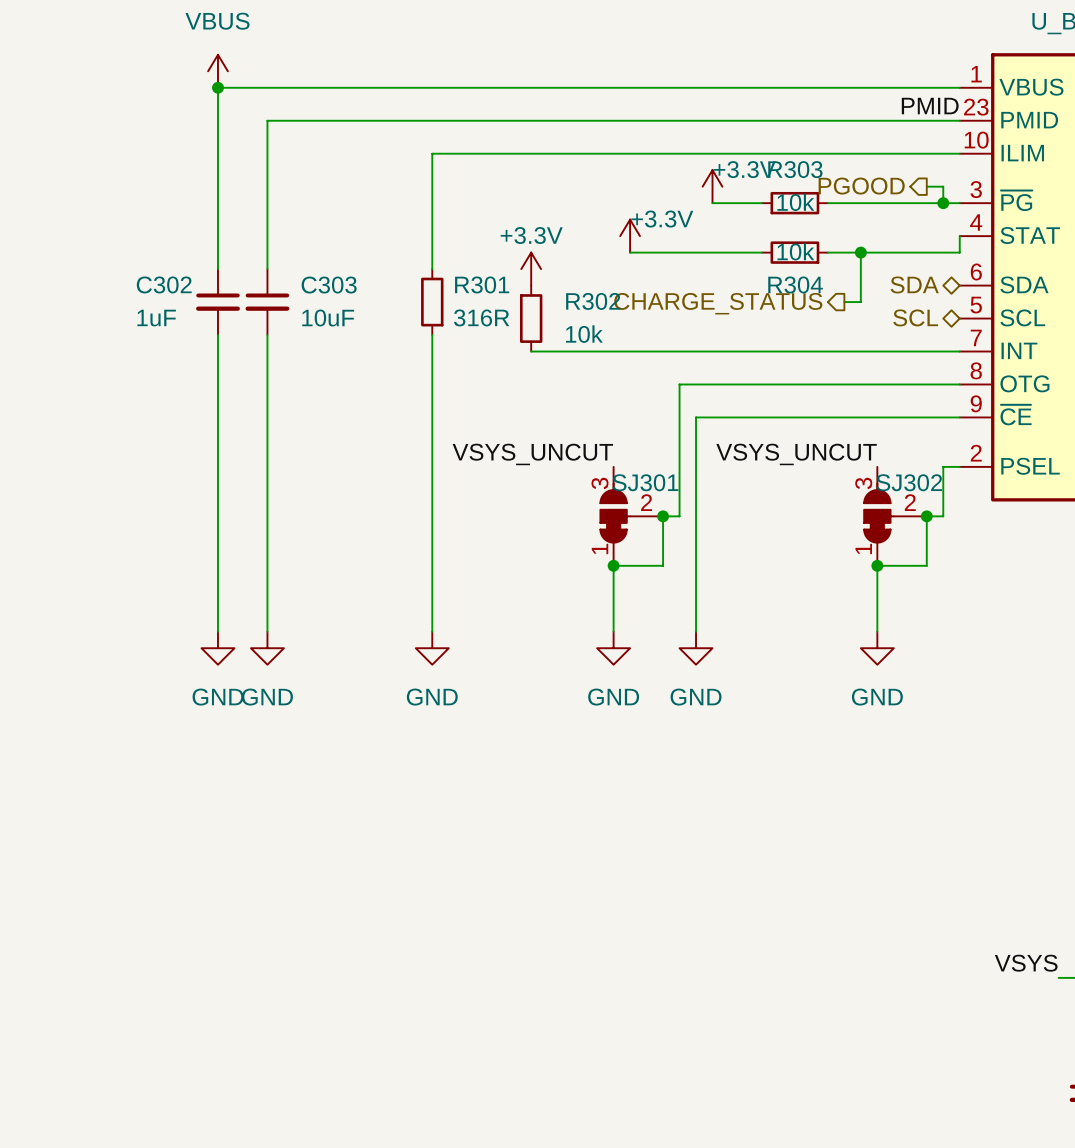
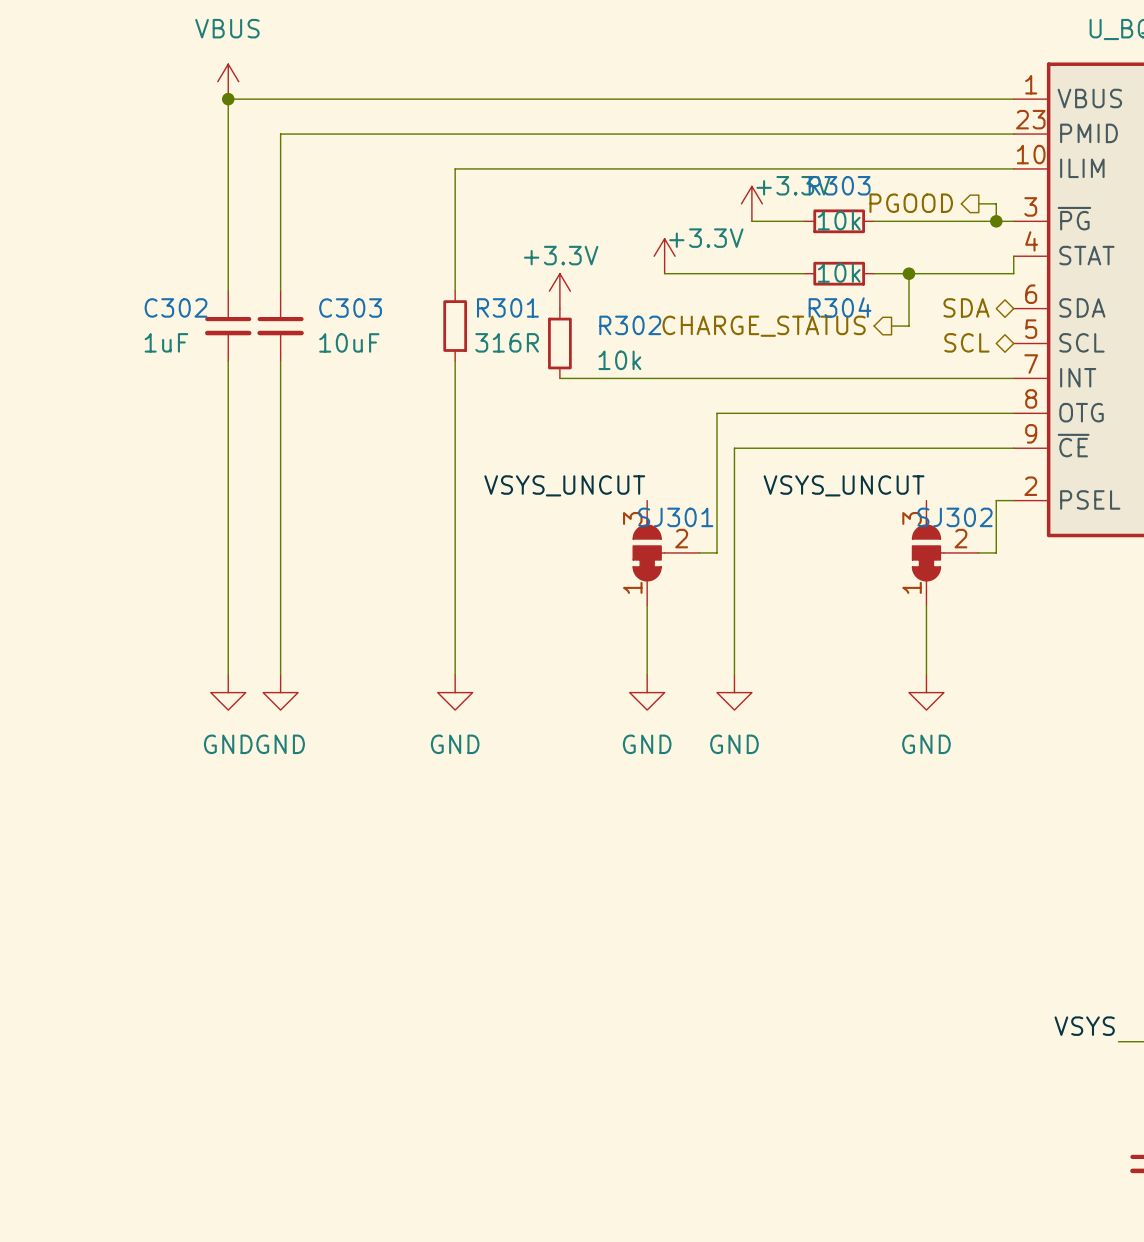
label: PMID (930, 106) -> none
wire: (663, 516) (663, 565) (613, 565) -> none
junction: (663, 516) -> none
wire: (926, 516) (926, 565) (877, 565) -> none
junction: (926, 516) -> none
junction: (613, 565) -> none
junction: (877, 565) -> none

